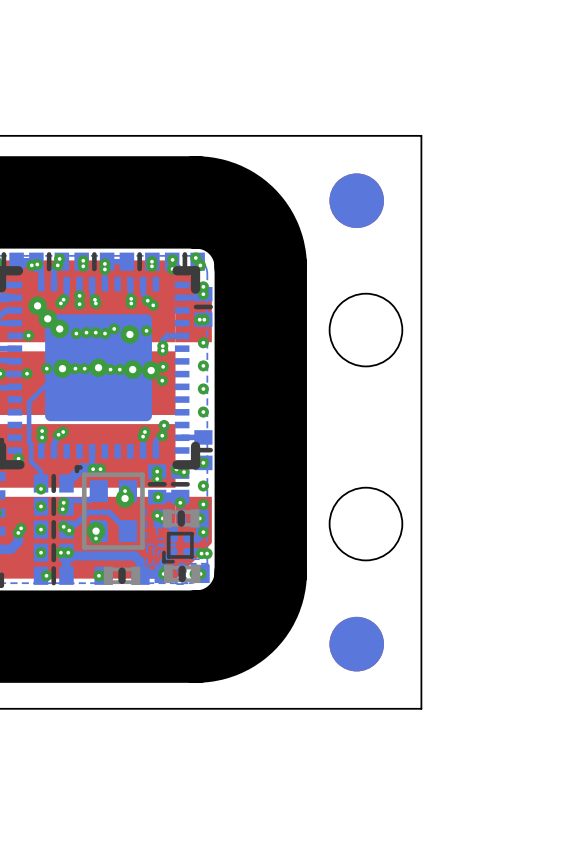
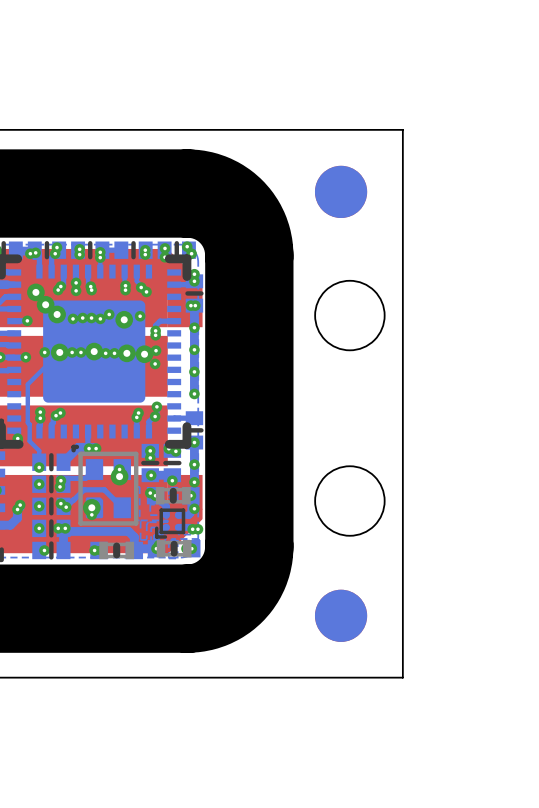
bottom track: none -> (190, 305) (194, 305) (194, 393)
bottom track: none -> (194, 442) (194, 482)

